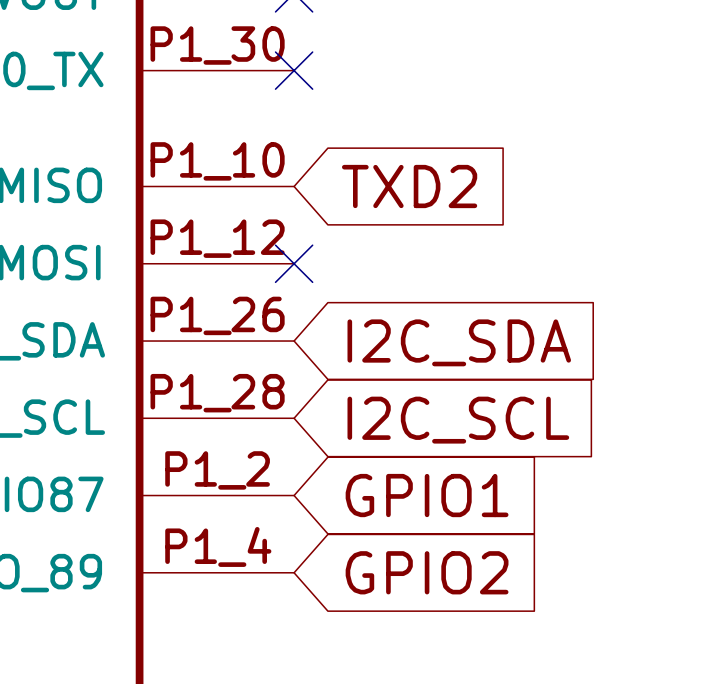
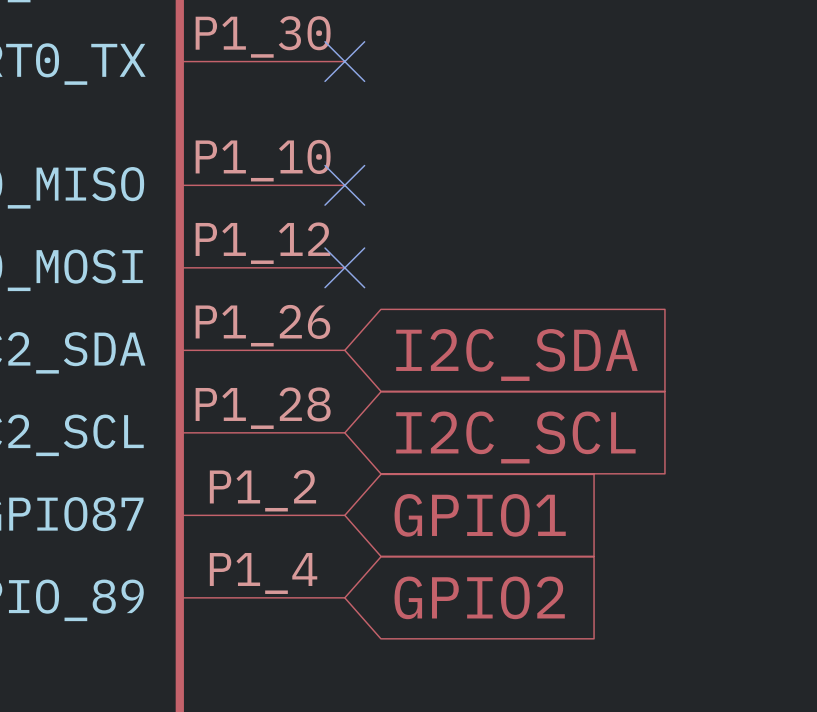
no-connect mark: none -> (344, 185)
global label: TXD2 (409, 186) -> none

